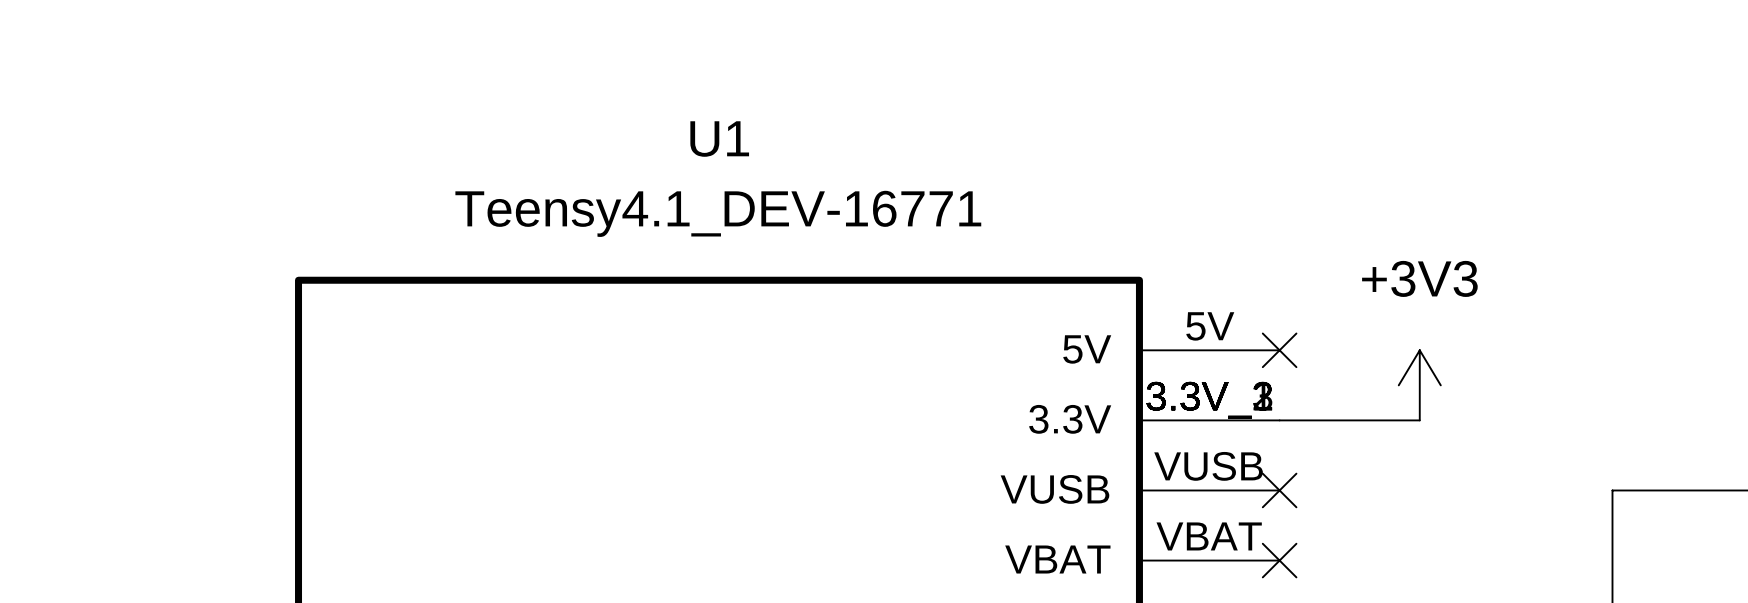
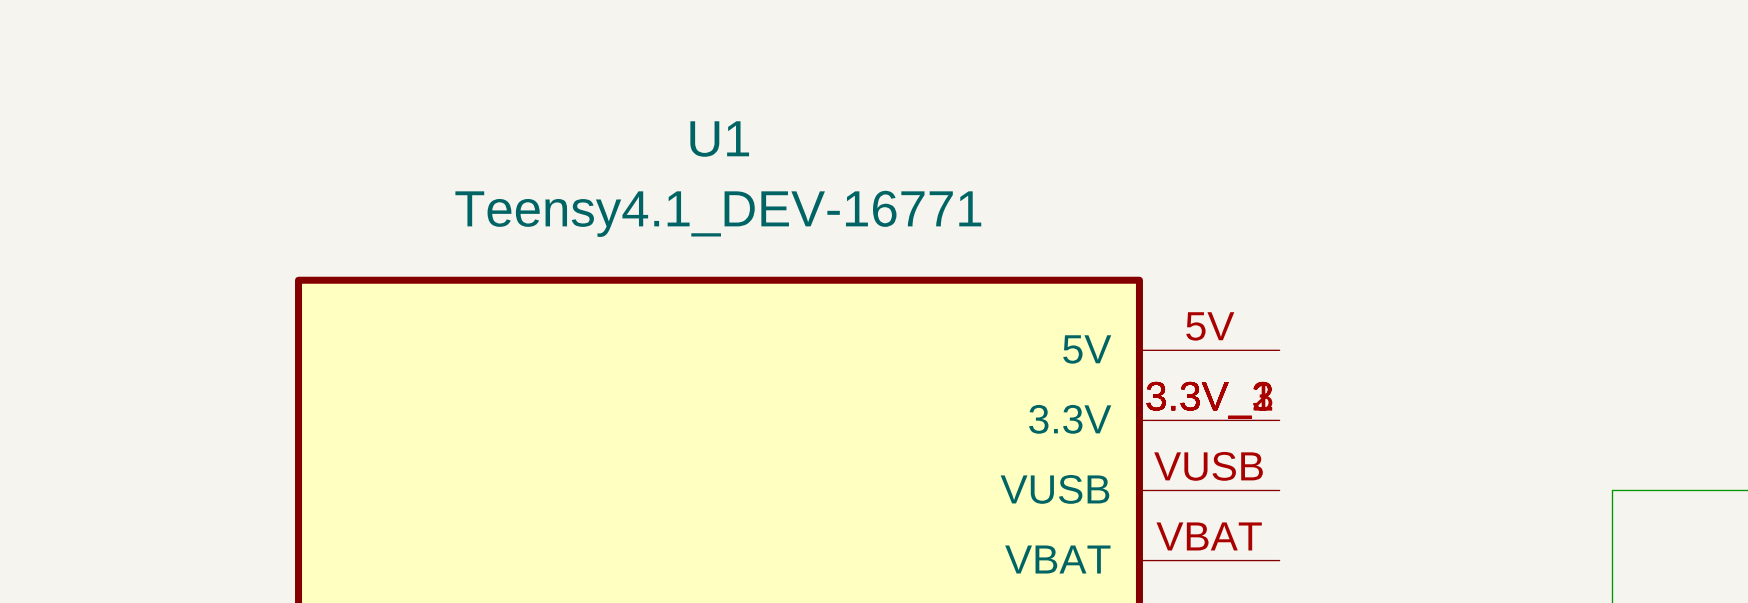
no-connect mark: (1279, 350) -> none
power symbol: +3V3 (1419, 385) -> none
wire: (1279, 420) (1419, 420) -> none
no-connect mark: (1279, 490) -> none
no-connect mark: (1279, 560) -> none

